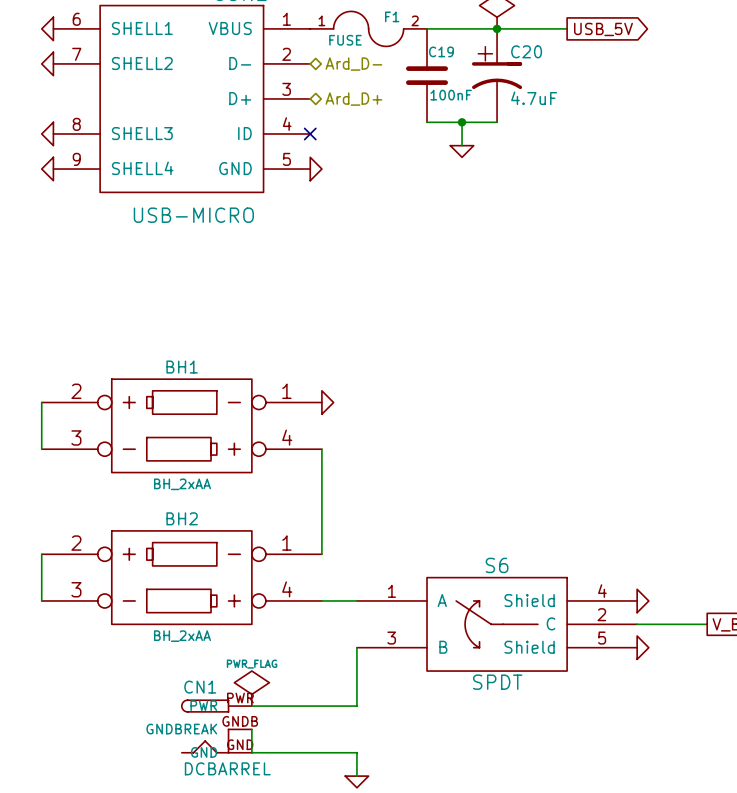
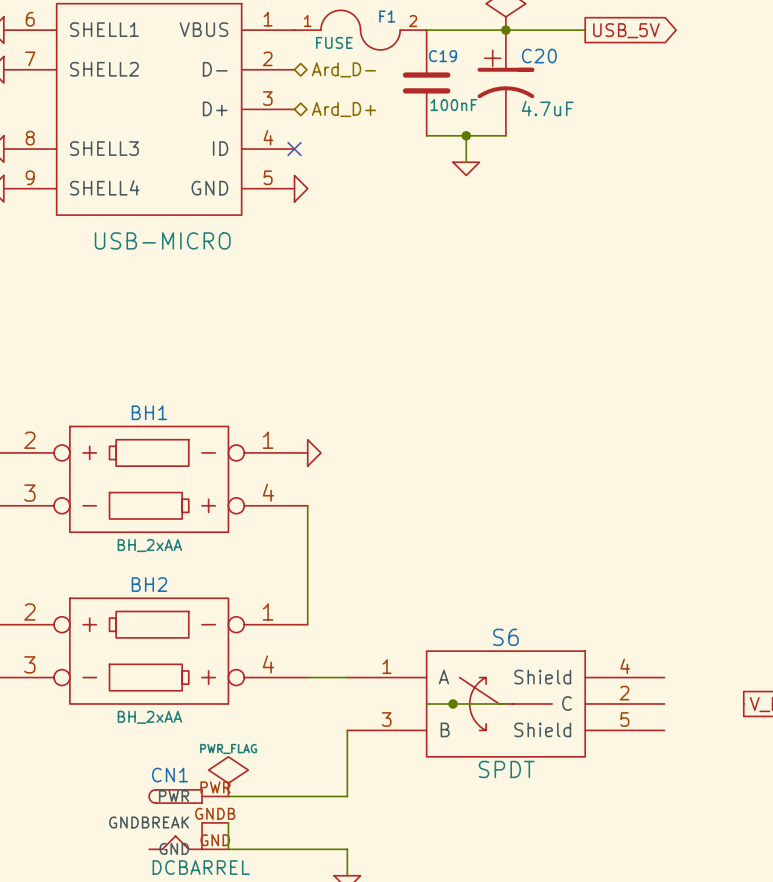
power symbol: (642, 600) -> none
junction: none -> (453, 703)
wire: (637, 624) (707, 624) -> (426, 703) (505, 703)
power symbol: (642, 647) -> none

